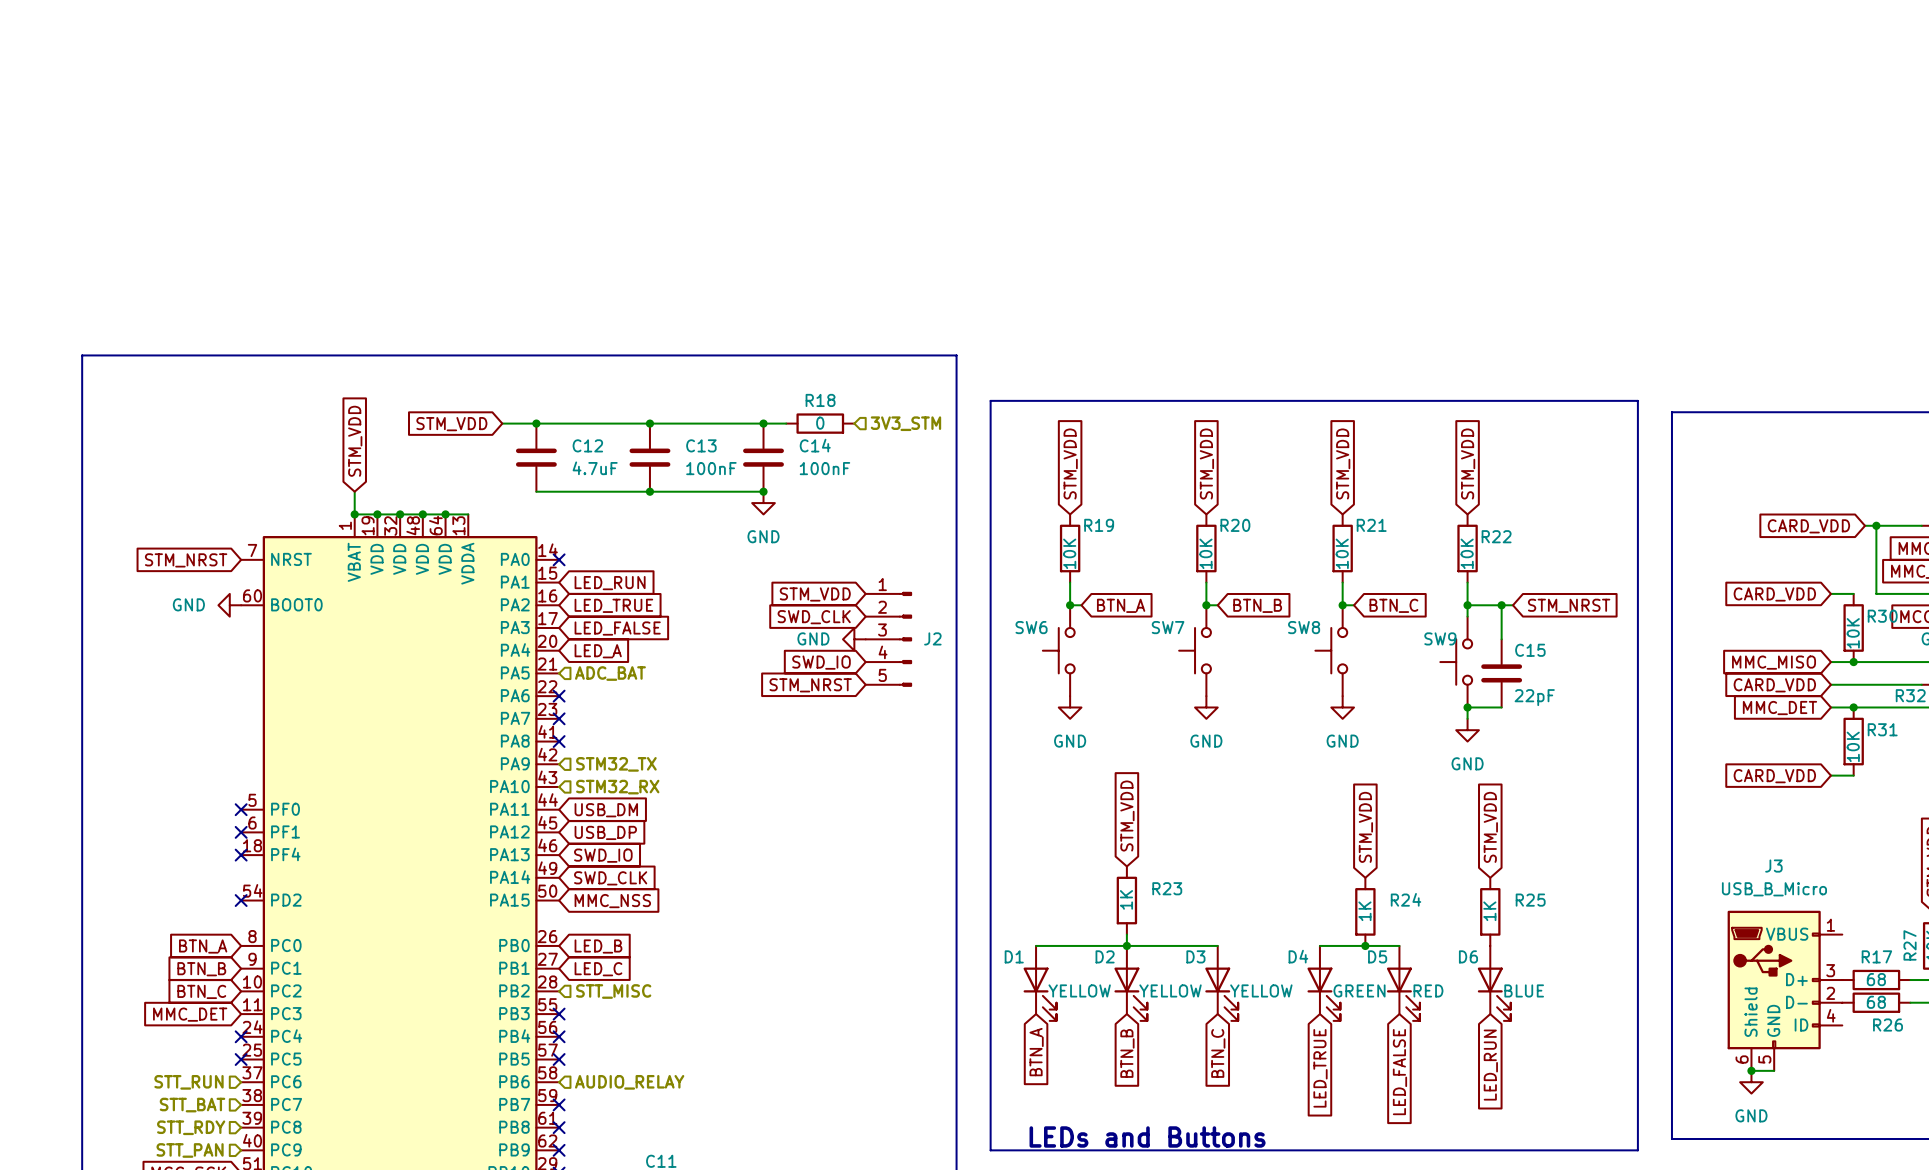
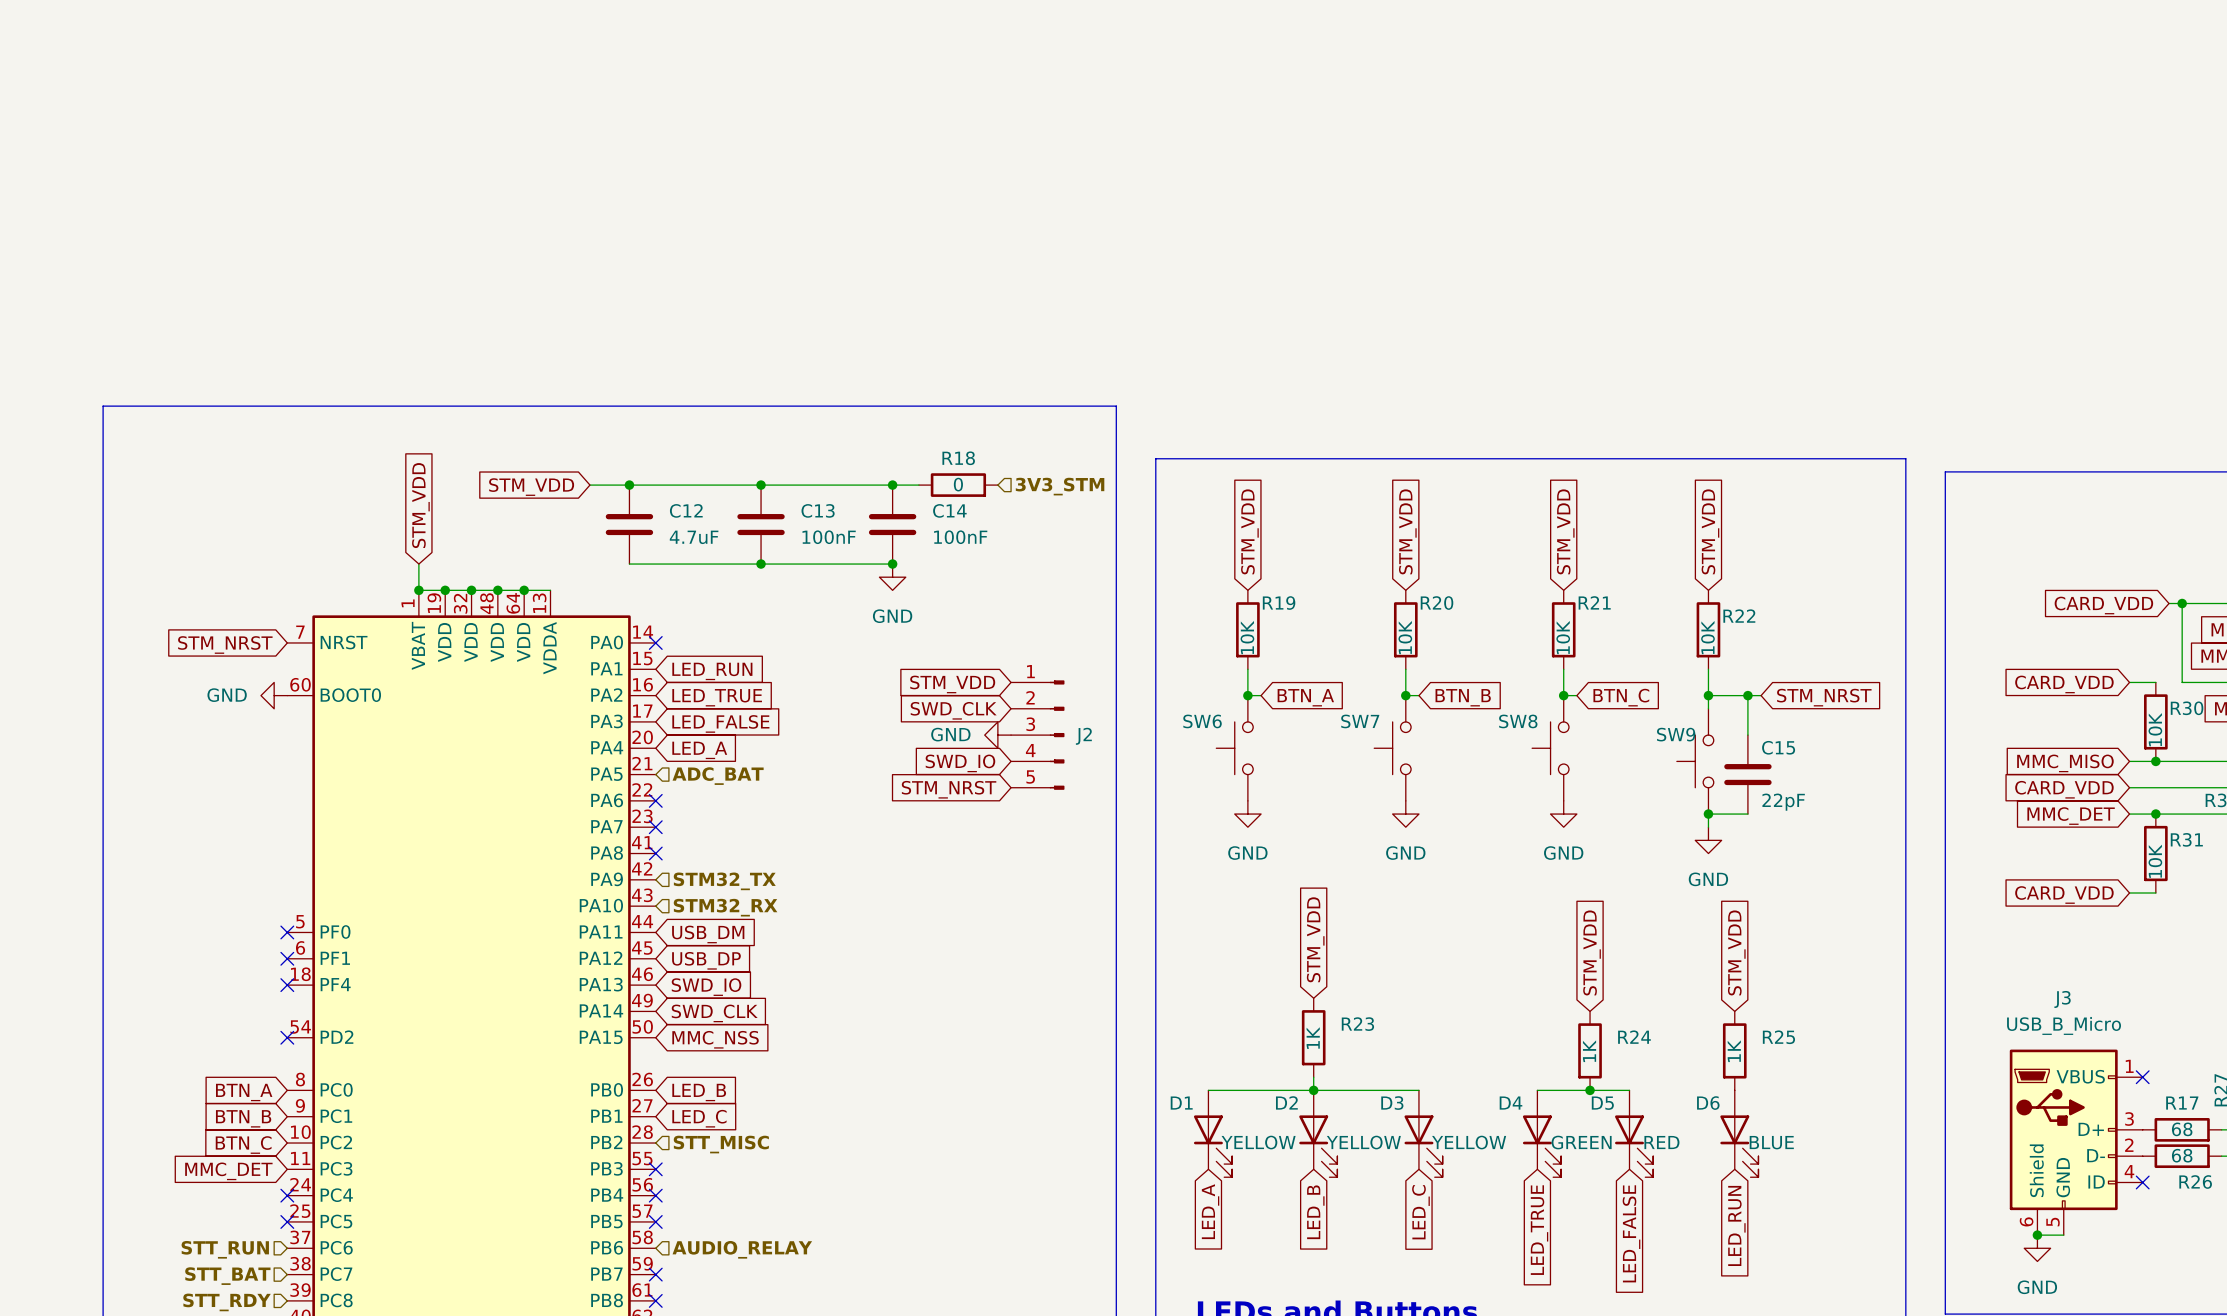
no-connect mark: none -> (2142, 1077)
no-connect mark: none -> (2142, 1182)
global label: BTN_A (1036, 1052) -> LED_A (1210, 1211)
global label: BTN_B (1127, 1053) -> LED_B (1315, 1212)
global label: BTN_C (1218, 1053) -> LED_C (1420, 1212)

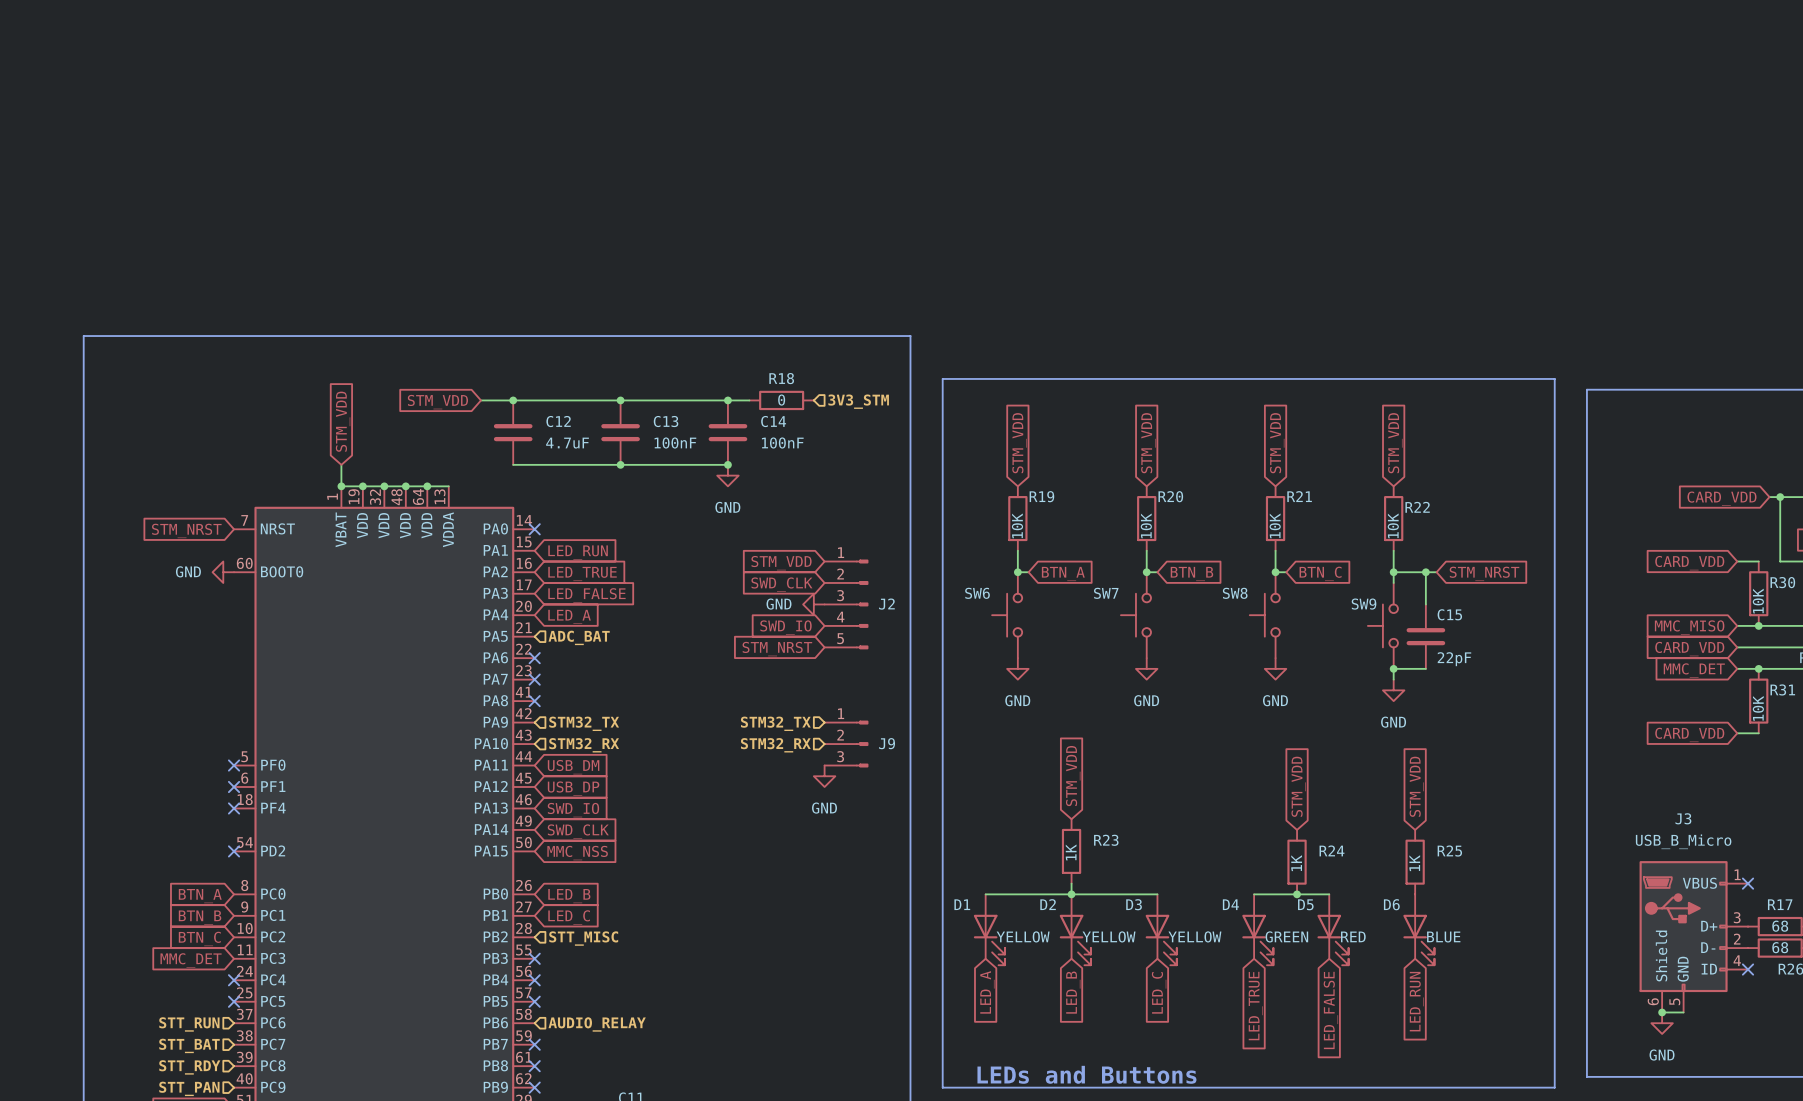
hierarchical label: none -> STM32_TX (775, 723)
J9: none -> (846, 744)
hierarchical label: none -> STM32_RX (775, 745)
power symbol: none -> GND (824, 776)

